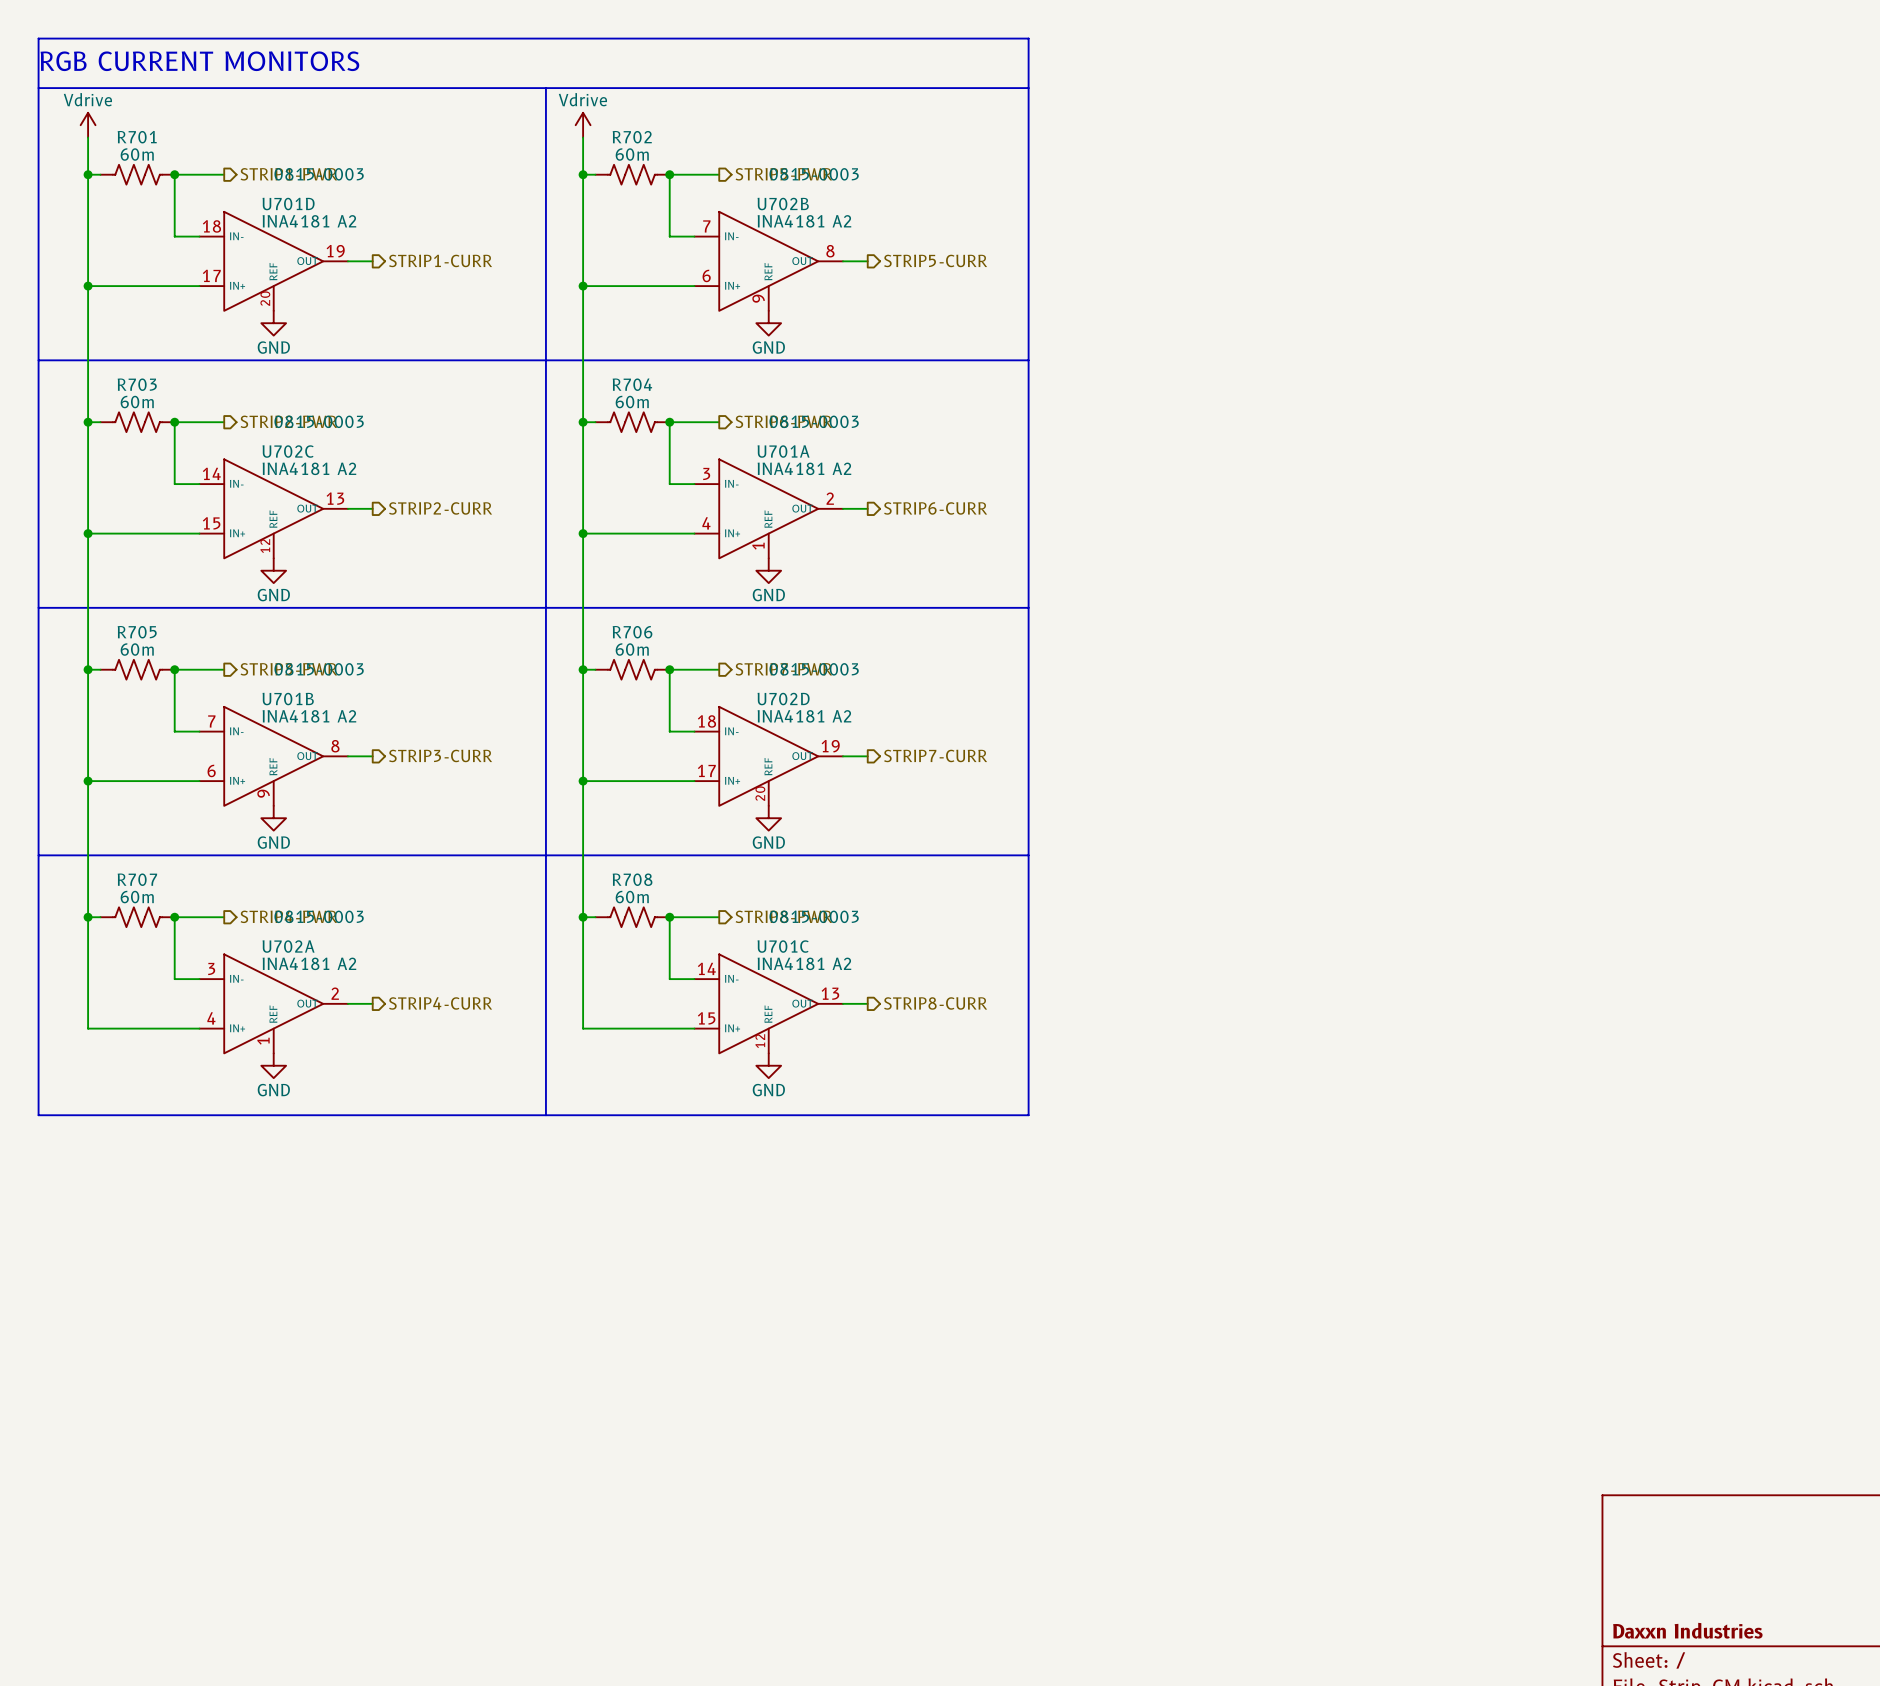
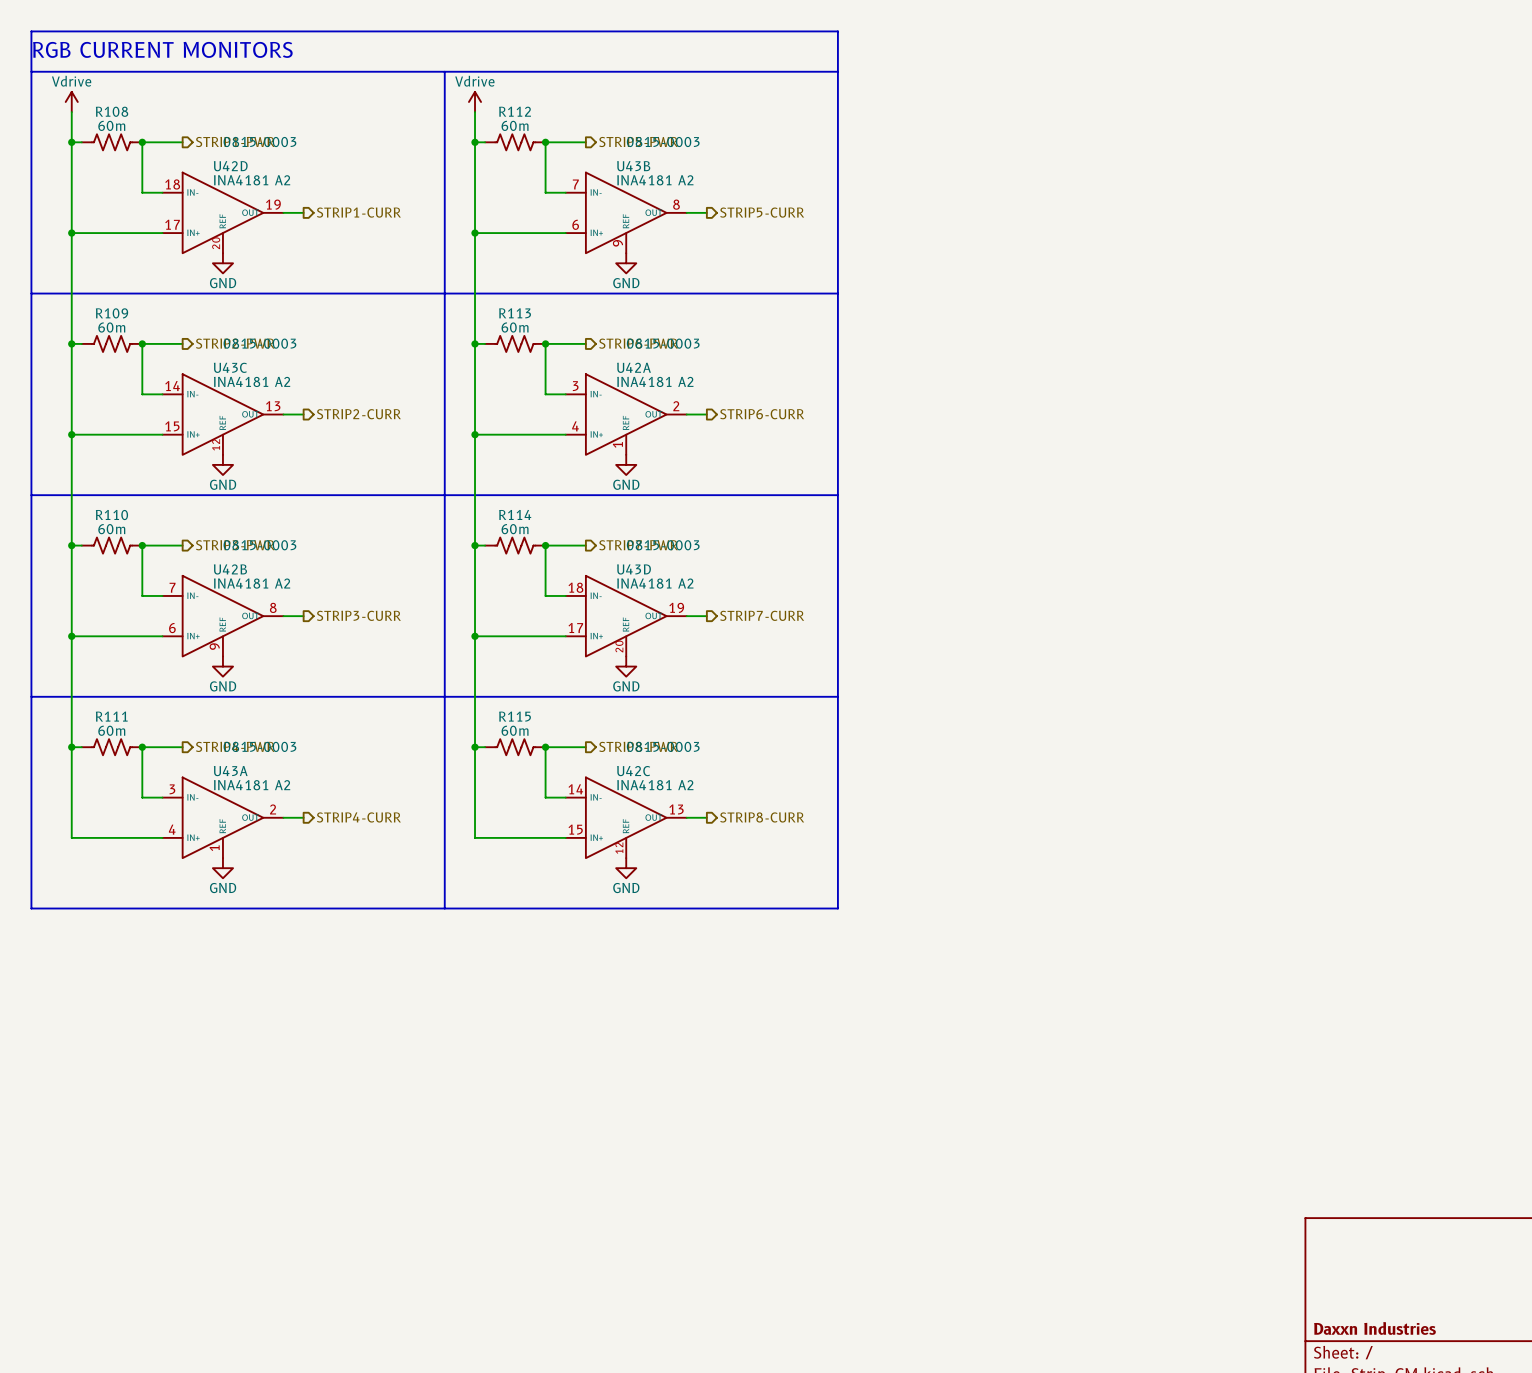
R701 name: R701 (137, 137) -> R108 (112, 111)
R702 name: R702 (632, 137) -> R112 (515, 111)
U701D name: U701D (288, 204) -> U42D (230, 166)
U702B name: U702B (783, 204) -> U43B (633, 166)
R703 name: R703 (137, 384) -> R109 (112, 313)
R704 name: R704 (632, 384) -> R113 (515, 313)
U702C name: U702C (288, 451) -> U43C (230, 367)
U701A name: U701A (783, 451) -> U42A (634, 367)
R705 name: R705 (137, 632) -> R110 (111, 515)
R706 name: R706 (632, 632) -> R114 (515, 514)
U701B name: U701B (288, 699) -> U42B (230, 569)
U702D name: U702D (783, 699) -> U43D (634, 569)
R707 name: R707 (137, 879) -> R111 (111, 716)
R708 name: R708 (632, 879) -> R115 (515, 716)
U702A name: U702A (288, 946) -> U43A (230, 771)
U701C name: U701C (783, 946) -> U42C (633, 771)

